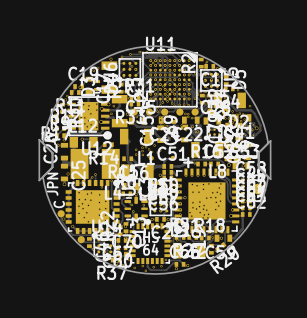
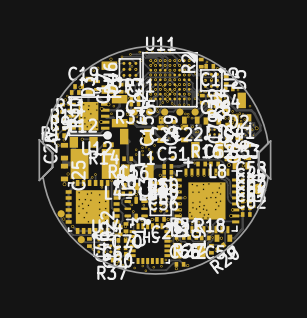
text: JPN (52, 184) -> none
text: C (59, 204) -> none
text: 64 (150, 249) -> none

